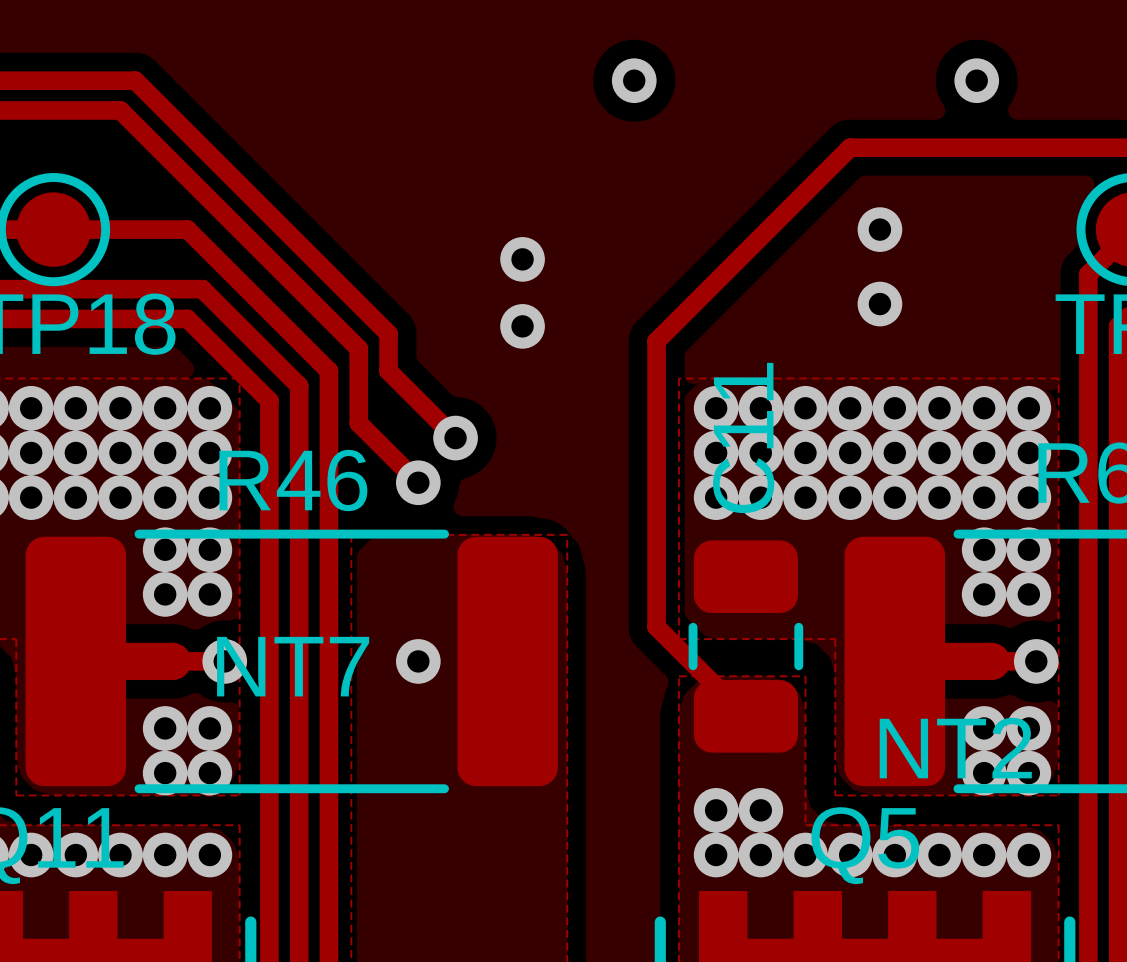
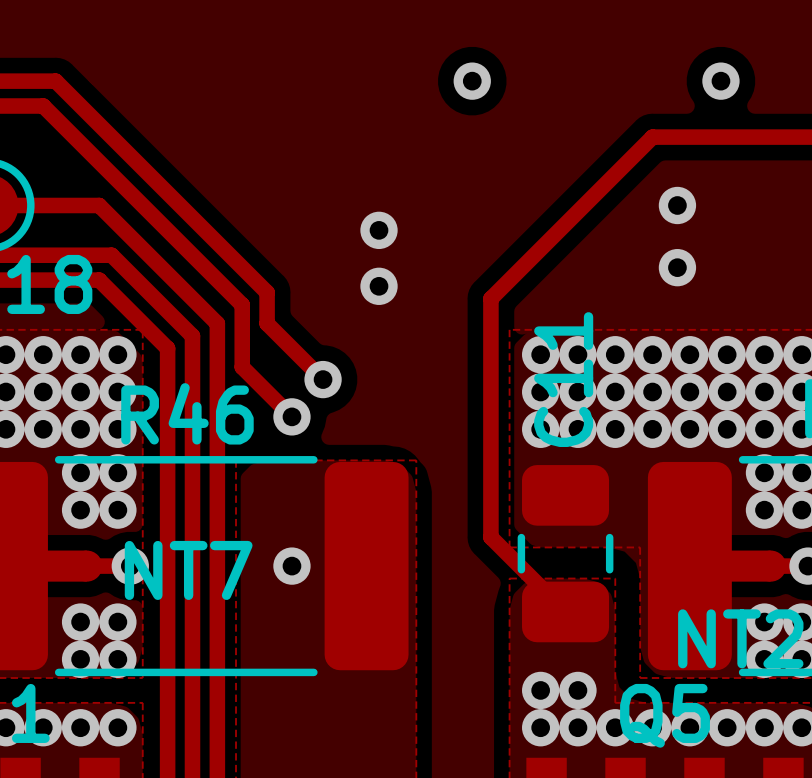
via position: (976, 80) -> (720, 81)

